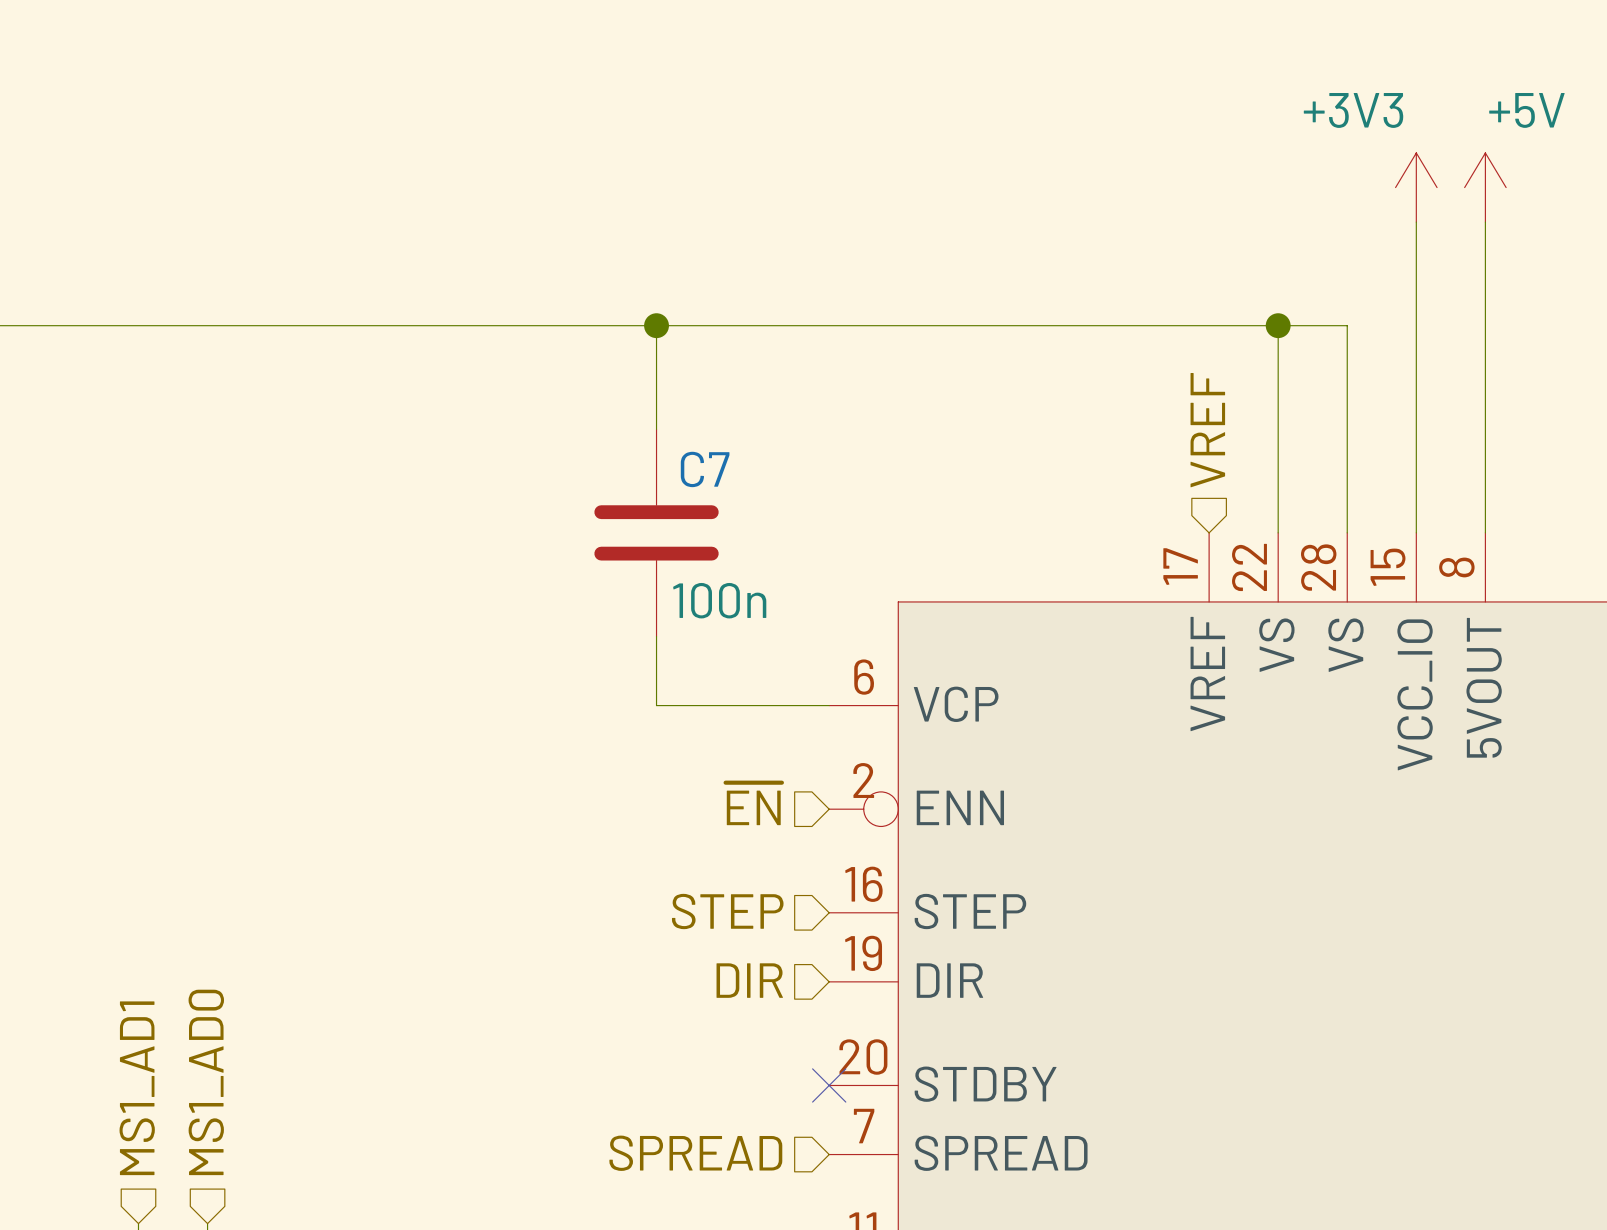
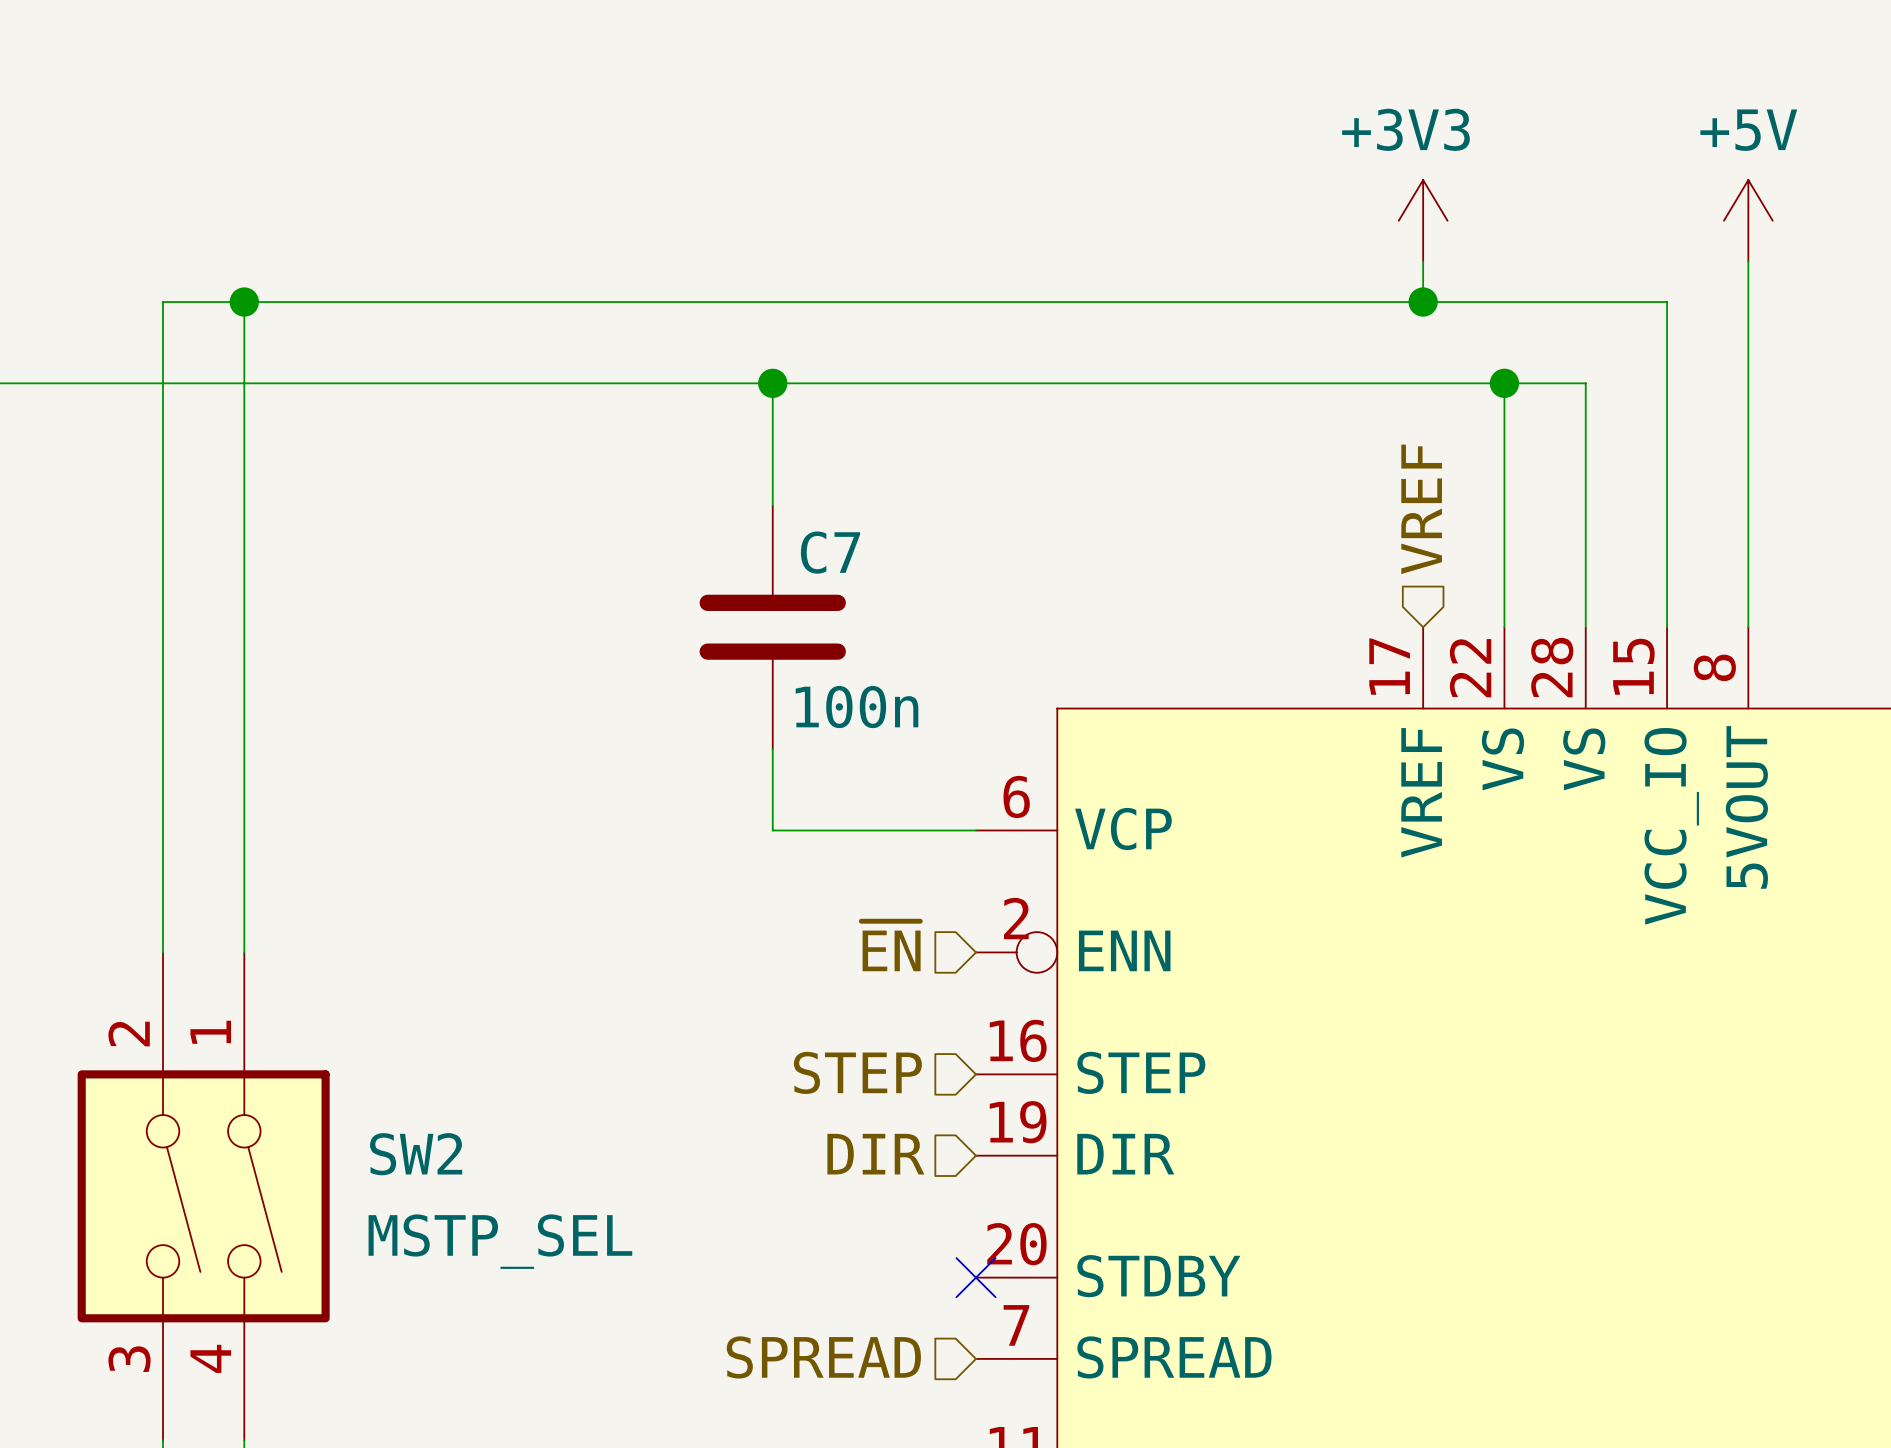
power symbol text position: +3V3 (1353, 110) -> +3V3 (1405, 129)
power symbol text position: +5V (1526, 110) -> +5V (1748, 130)
power symbol position: +3V3 (1416, 187) -> +3V3 (1423, 220)
wire: none -> (1423, 261) (1423, 302)
wire: (1416, 222) (1416, 256) -> (163, 952) (163, 302) (1667, 302)
wire: none -> (244, 302) (244, 952)
junction: none -> (244, 302)
junction: none -> (1423, 302)
SW2: none -> MSTP_SEL (203, 1196)
hierarchical label: MS1_AD0 (206, 1082) -> none
hierarchical label: MS1_AD1 (137, 1088) -> none

